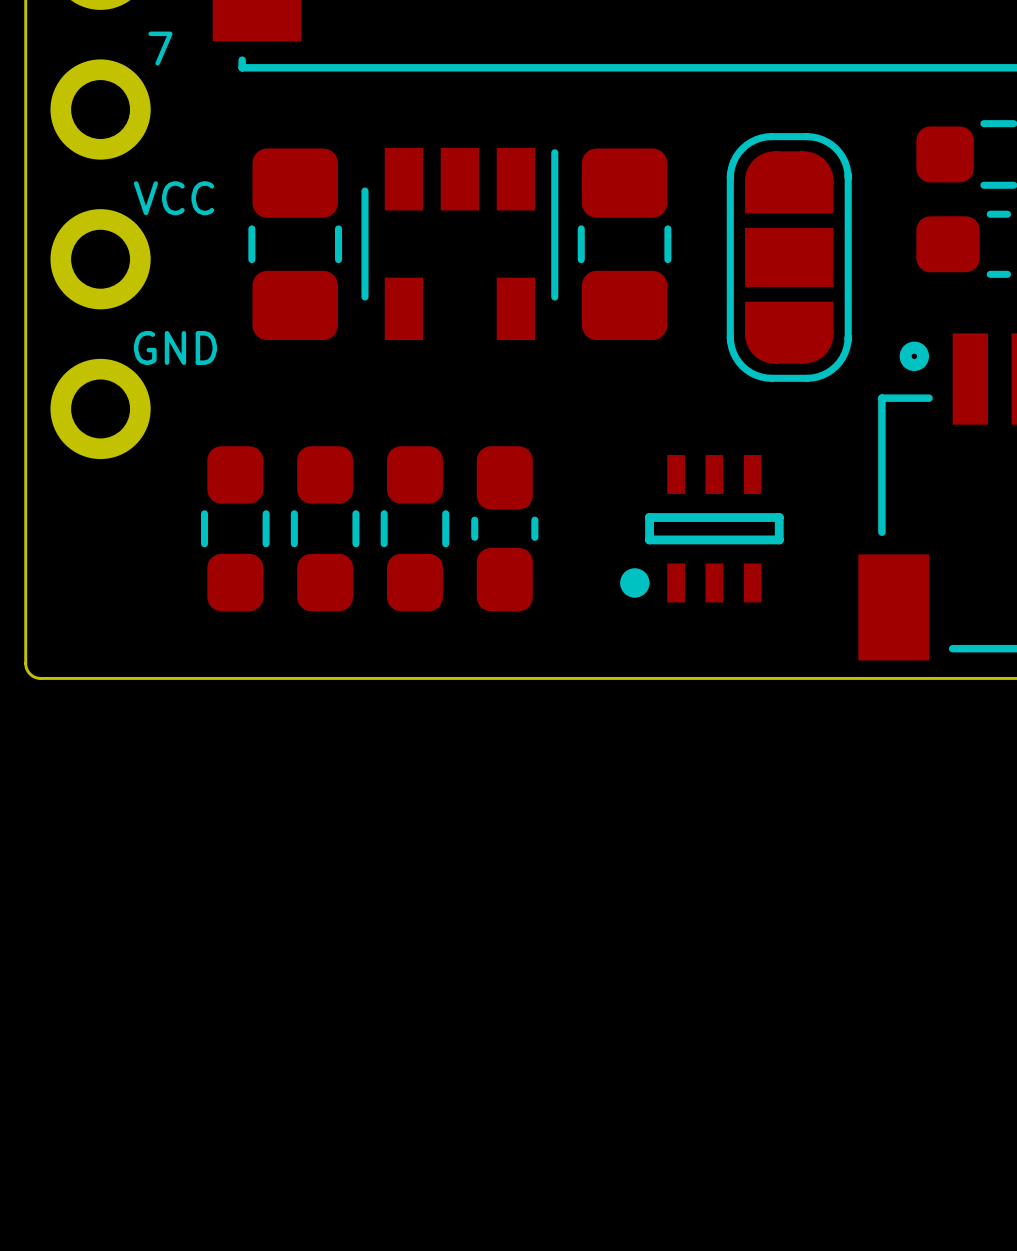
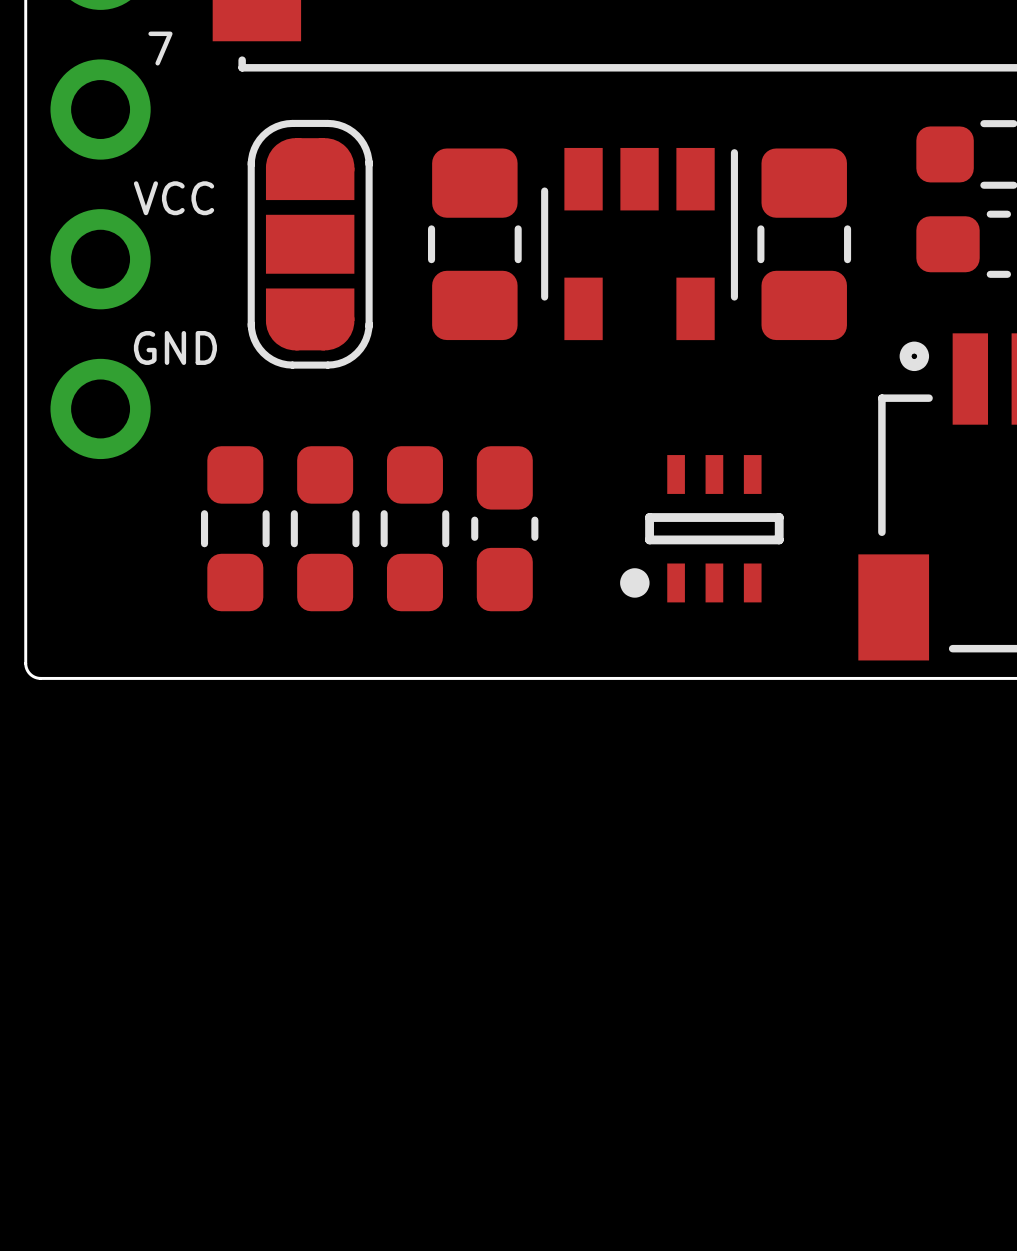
part footprint: [726, 133, 852, 382] -> [757, 148, 852, 341]
part footprint: [361, 147, 559, 341] -> [428, 148, 522, 341]
part footprint: [248, 148, 343, 341] -> [247, 119, 373, 369]
part footprint: [577, 148, 672, 341] -> [541, 147, 738, 341]

